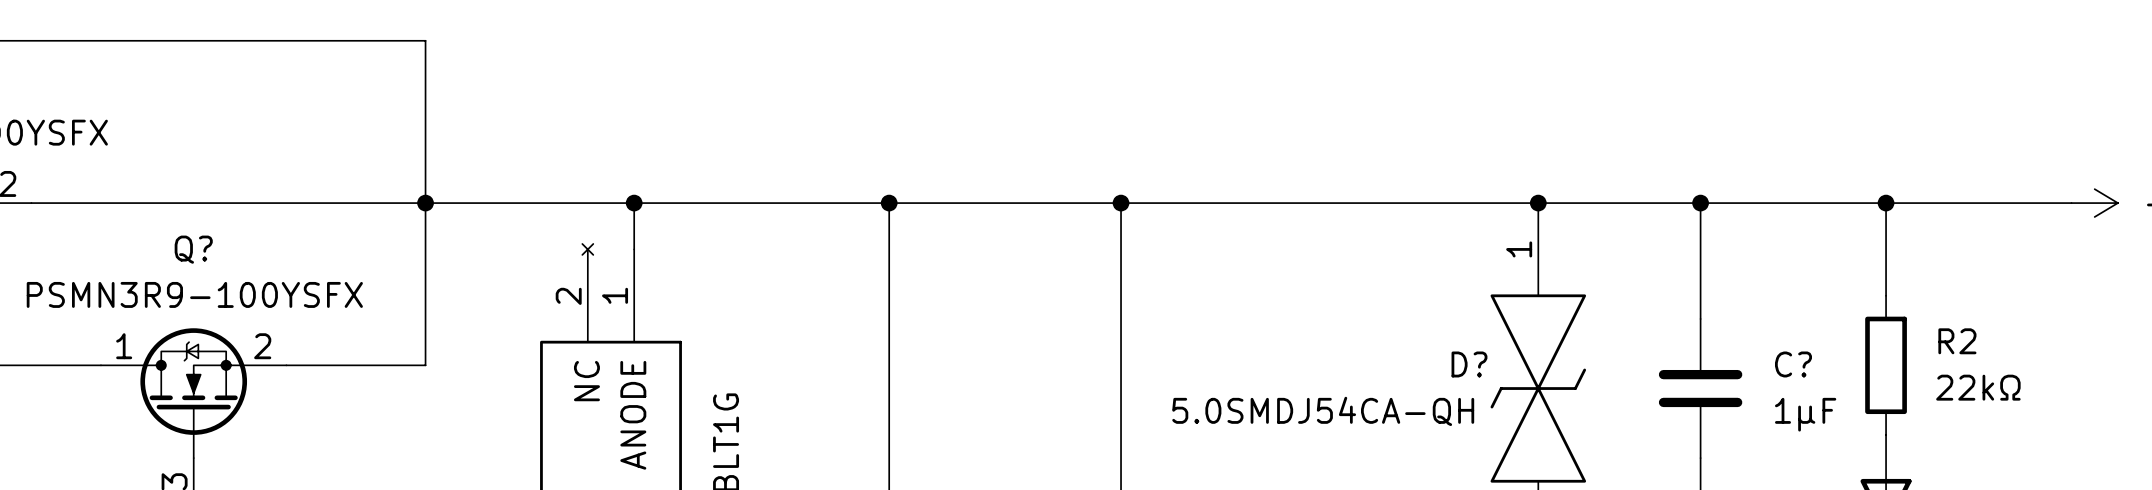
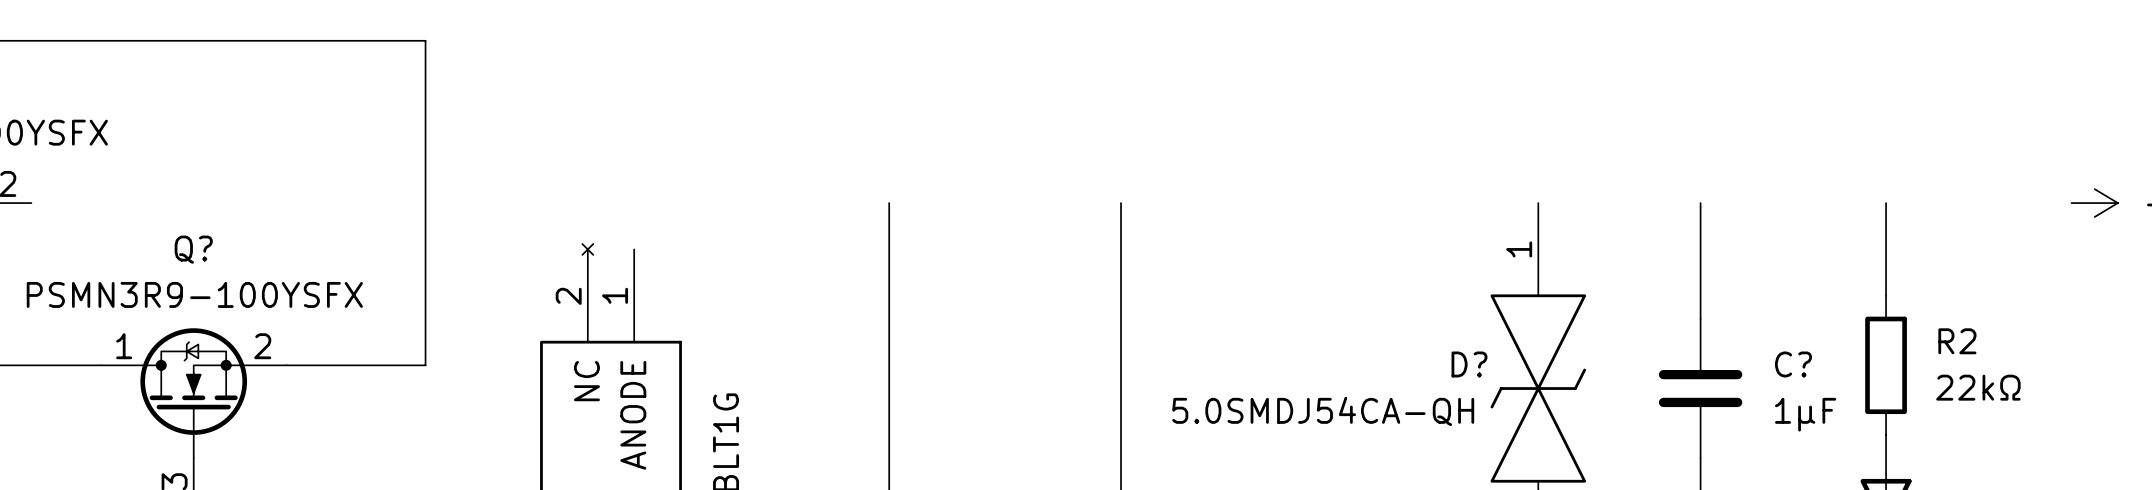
wire: (31, 203) (2071, 203) -> none
junction: (425, 203) -> none
wire: (634, 203) (634, 249) -> none
junction: (634, 203) -> none
junction: (889, 203) -> none
junction: (1121, 203) -> none
junction: (1538, 203) -> none
junction: (1700, 203) -> none
junction: (1886, 203) -> none

